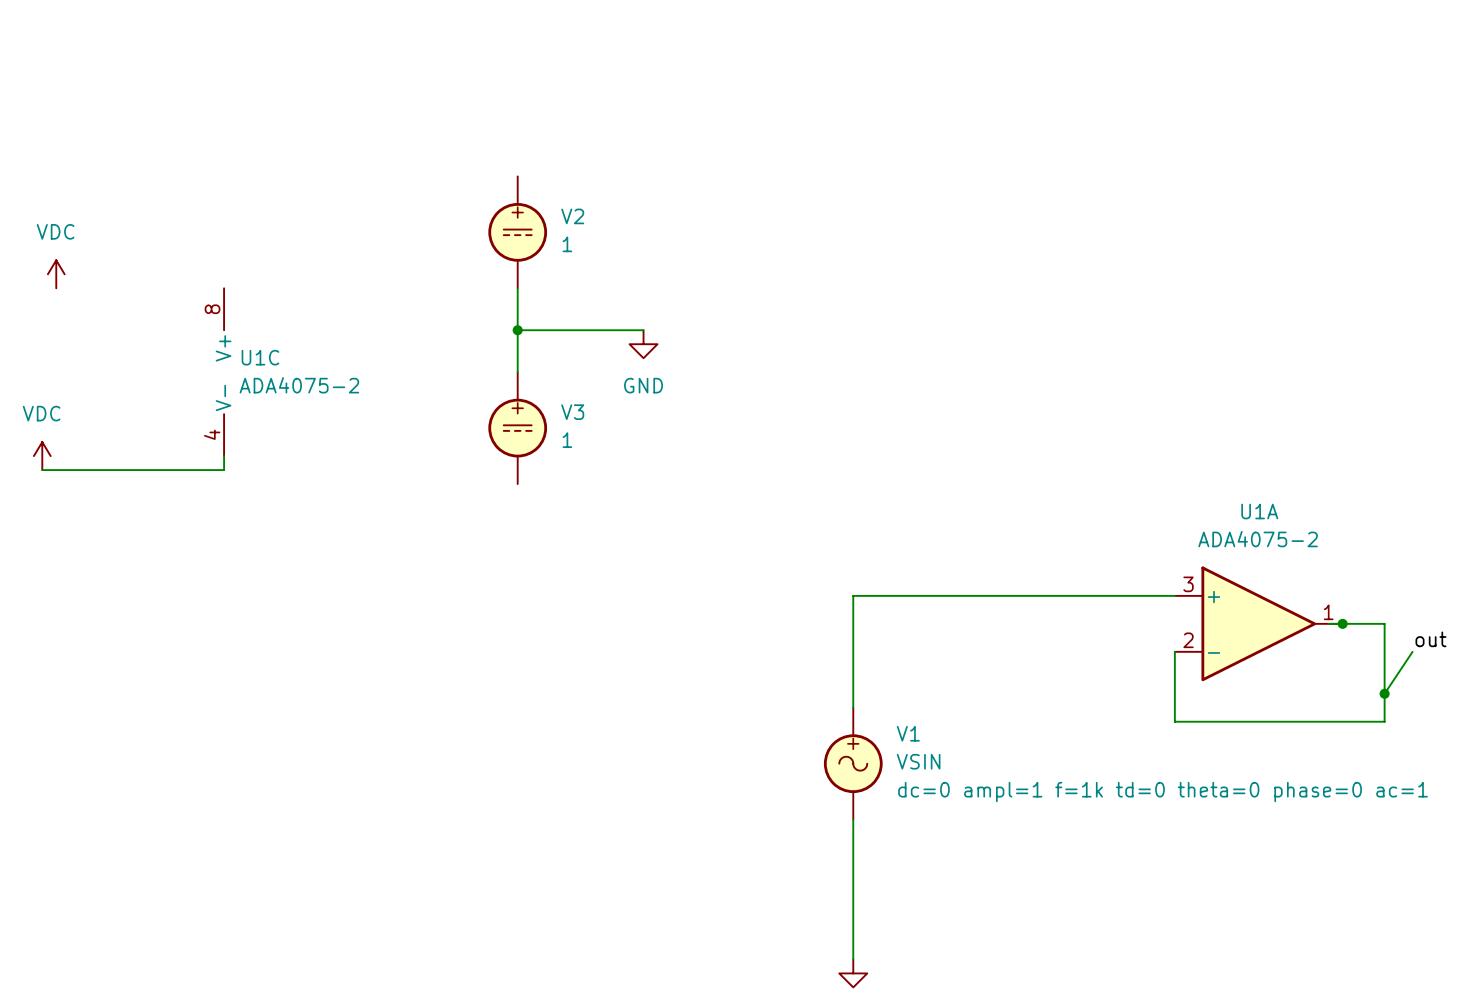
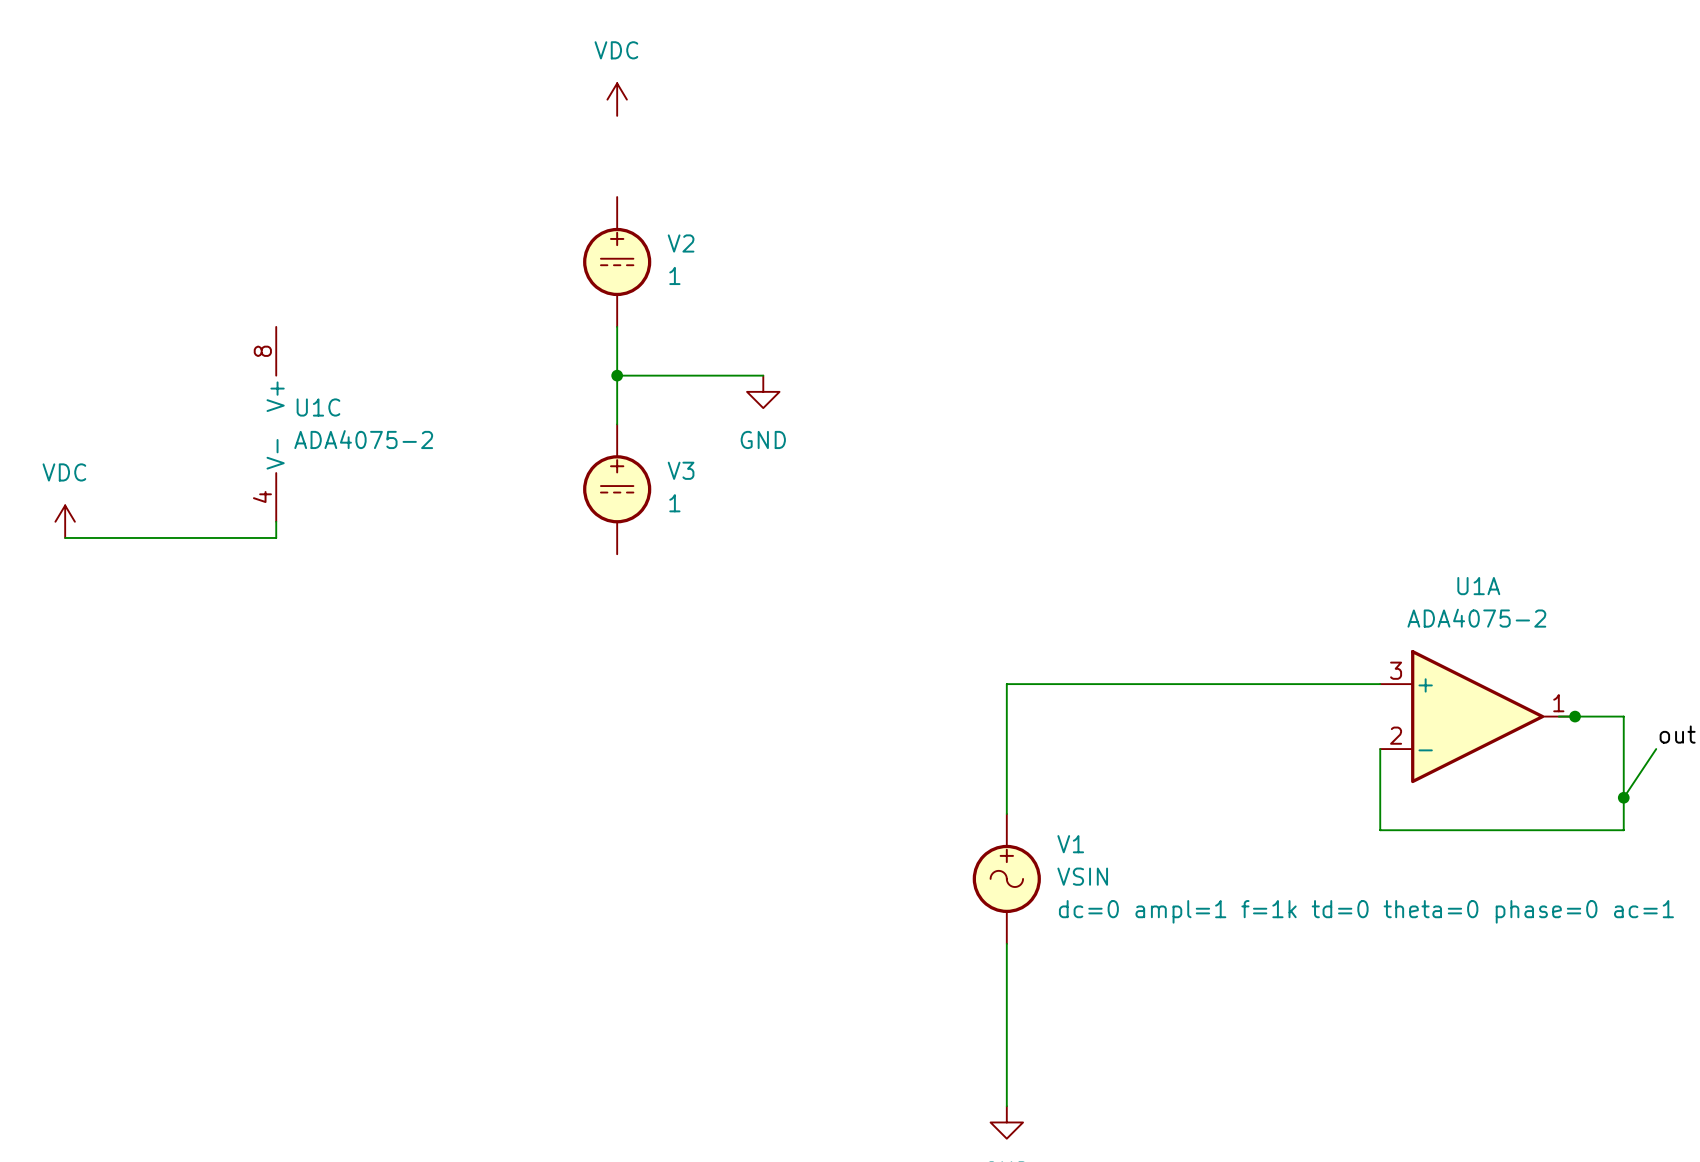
power symbol: none -> VDC (617, 99)
power symbol: VDC (56, 274) -> none

